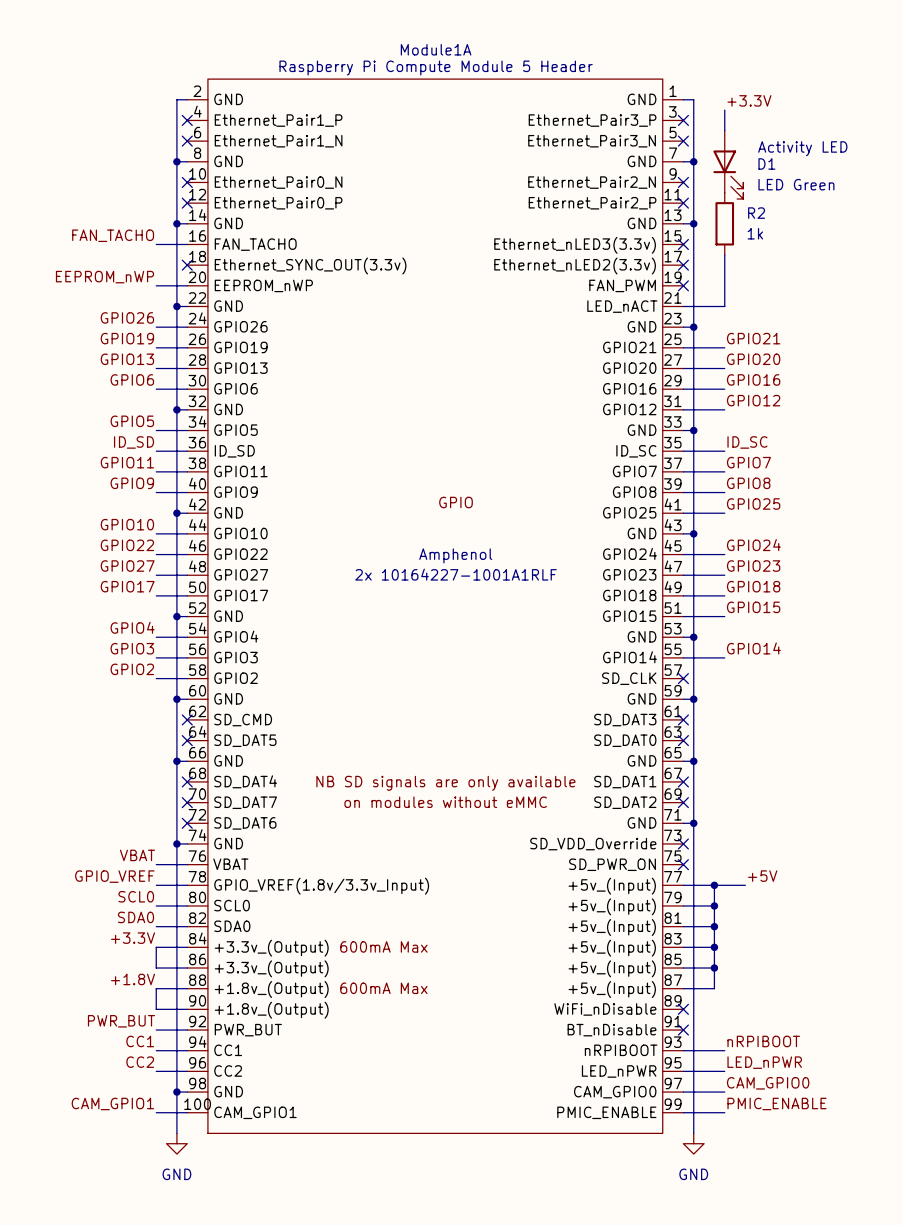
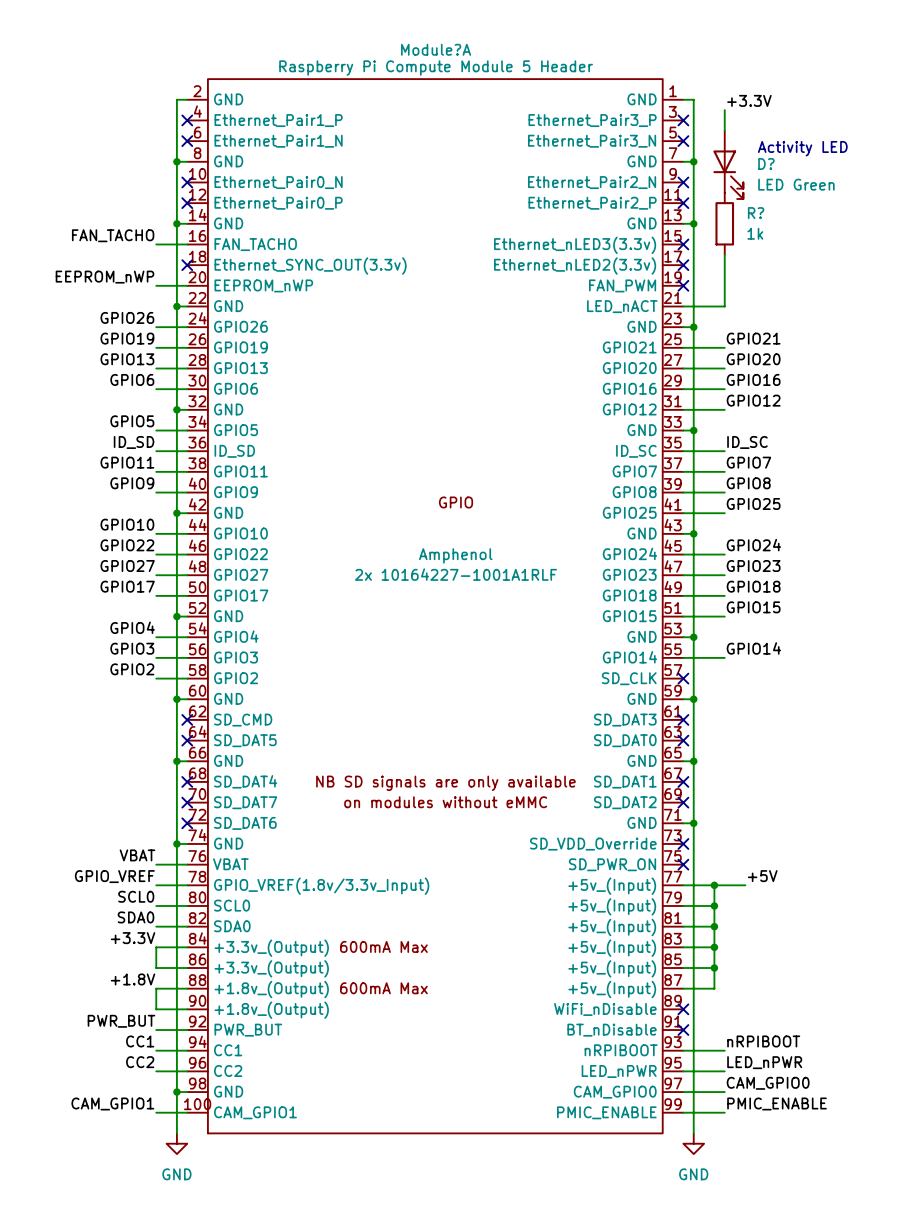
Module1A name: Module1A (436, 49) -> Module?A (436, 49)
D1 name: D1 (766, 163) -> D? (766, 163)
R2 name: R2 (756, 213) -> R? (756, 213)

